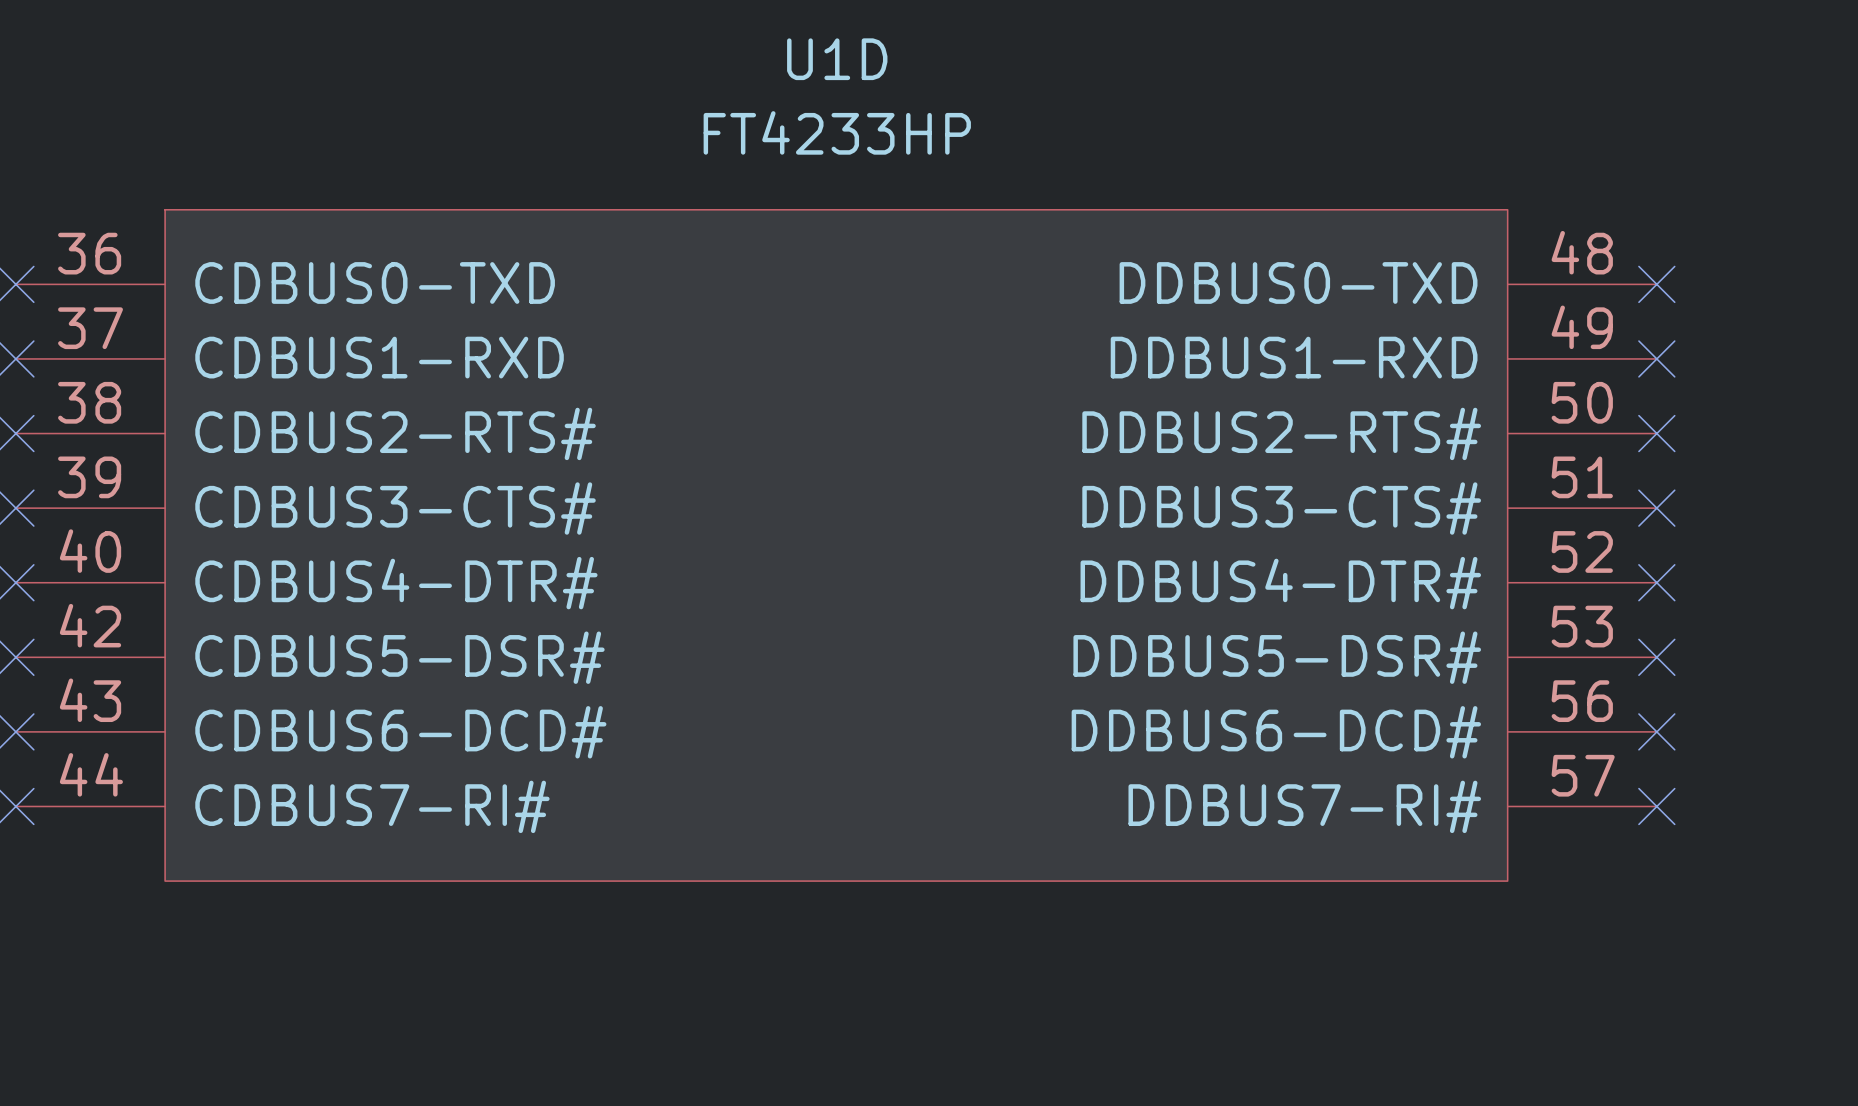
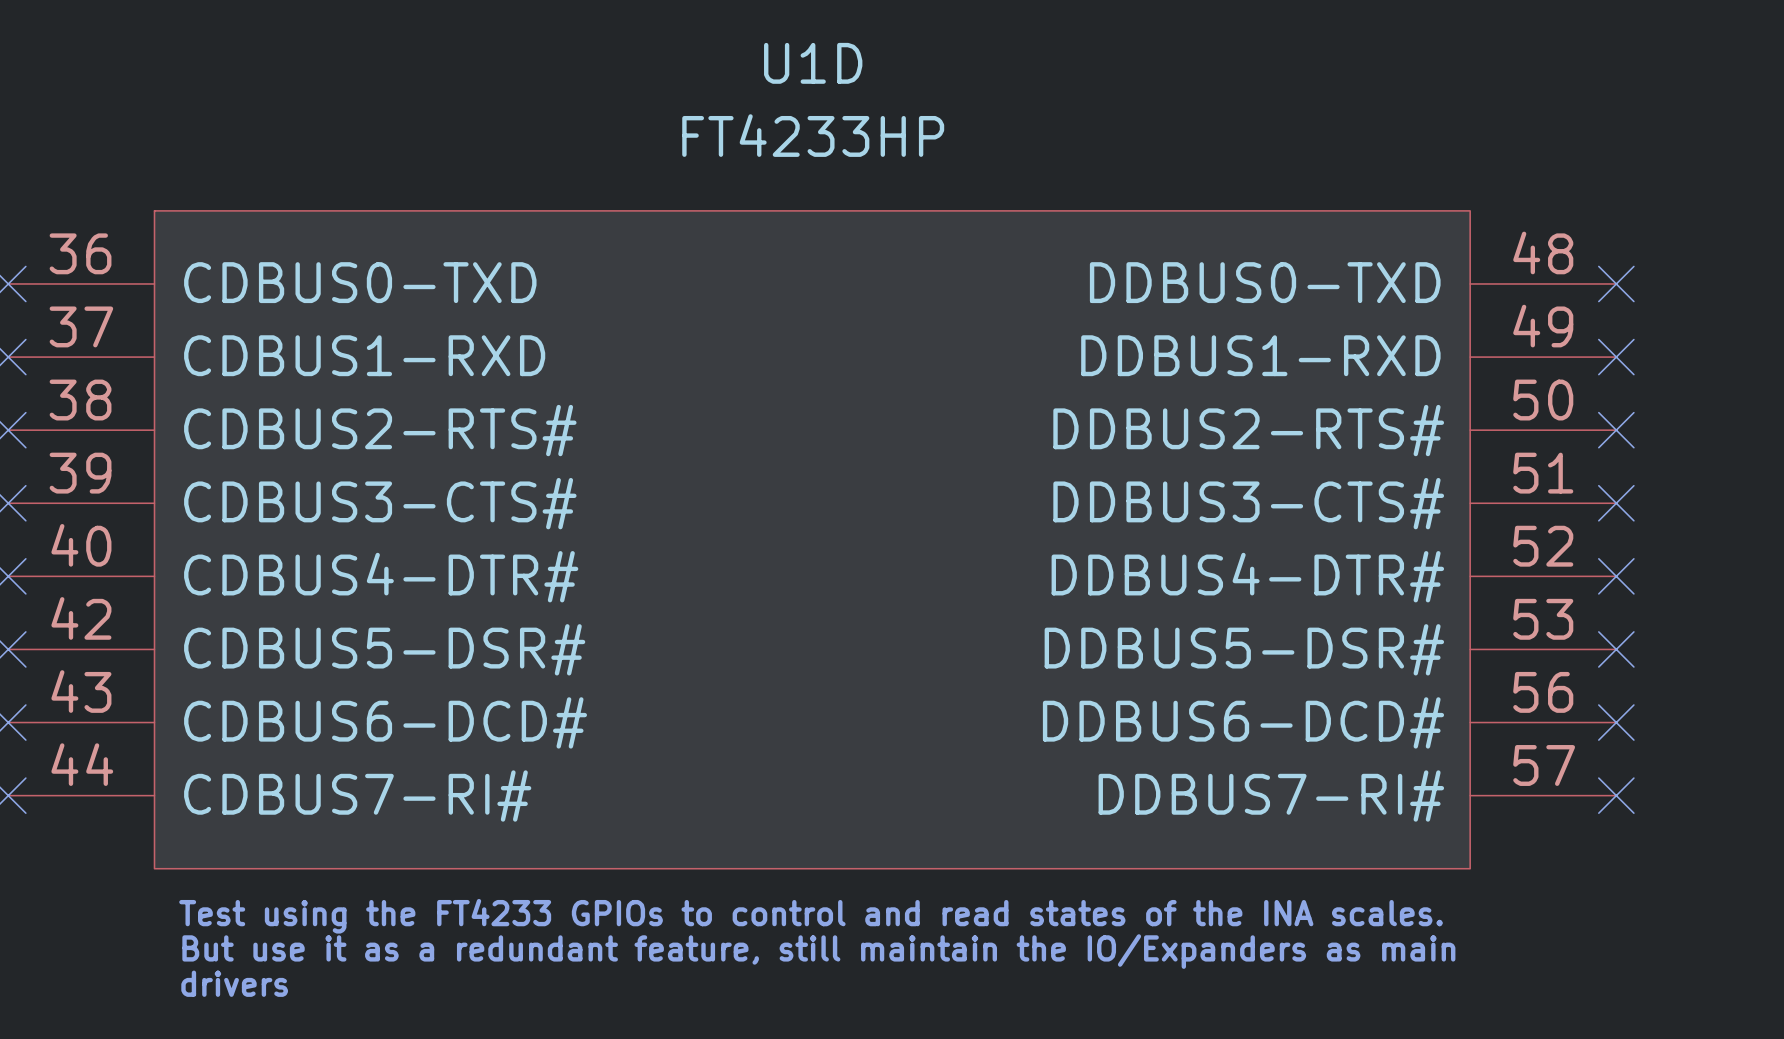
text: none -> Test using the FT4233 GPIOs to control and read states of the INA scales. (811, 916)
text: none -> But use it as a redundant feature, still maintain the IO/Expanders as main (818, 951)
text: none -> drivers (234, 983)

